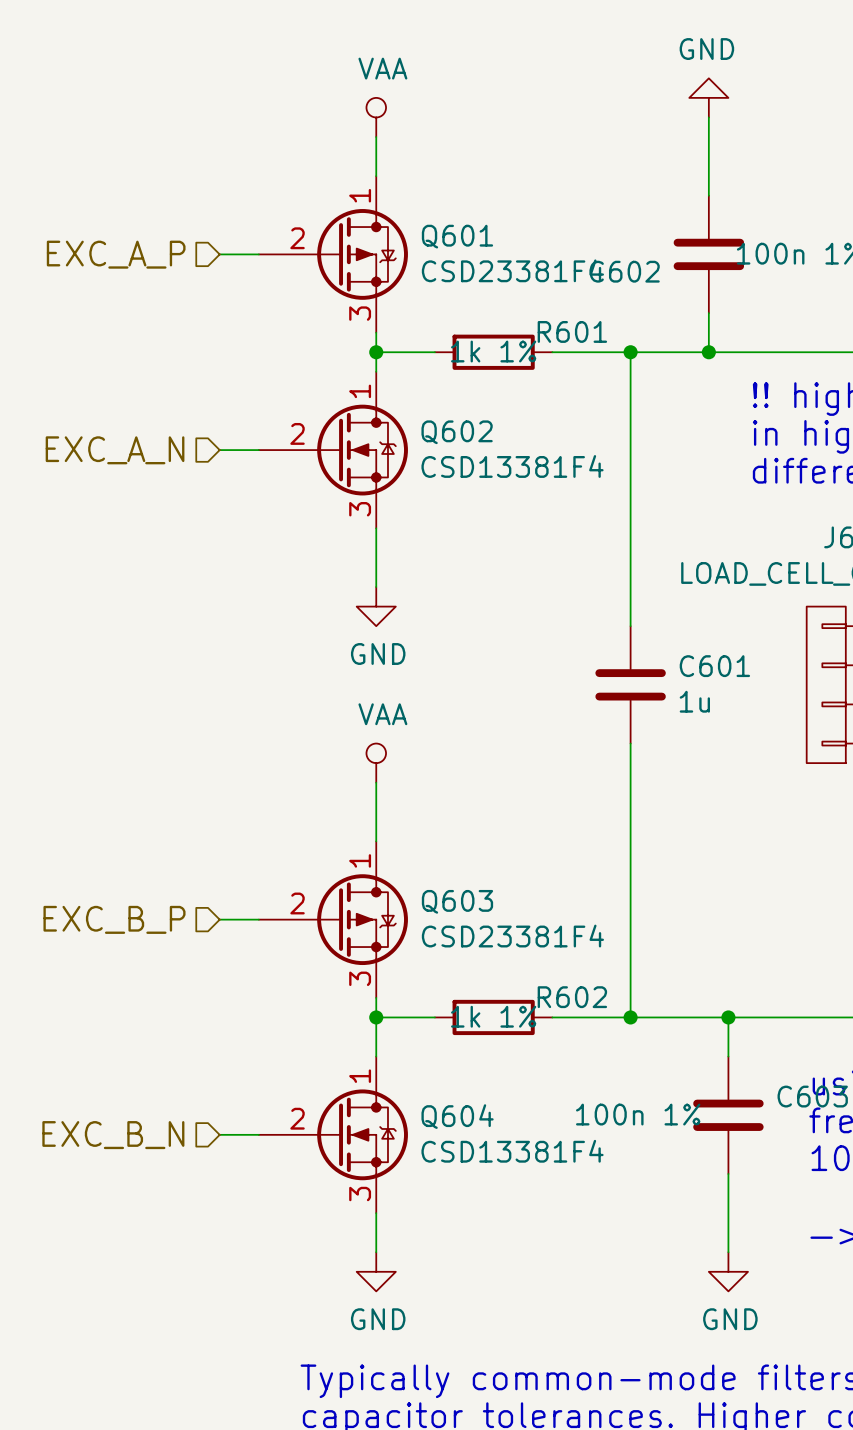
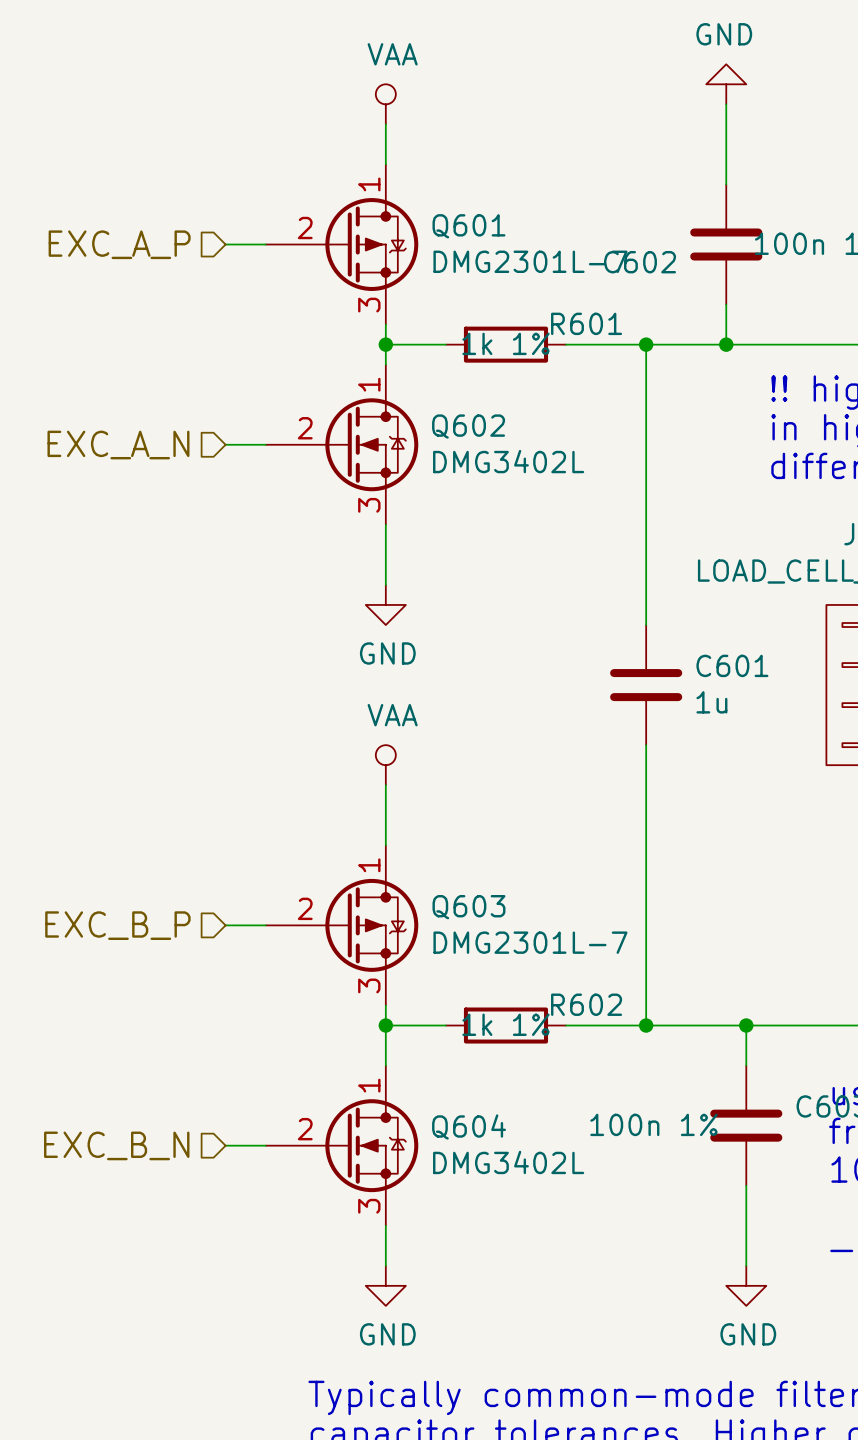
Q601 value: CSD23381F4 (512, 270) -> DMG2301L-7 (530, 261)
Q602 value: CSD13381F4 (512, 466) -> DMG3402L (508, 461)
Q603 value: CSD23381F4 (512, 936) -> DMG2301L-7 (530, 942)
Q604 value: CSD13381F4 (512, 1151) -> DMG3402L (508, 1162)

